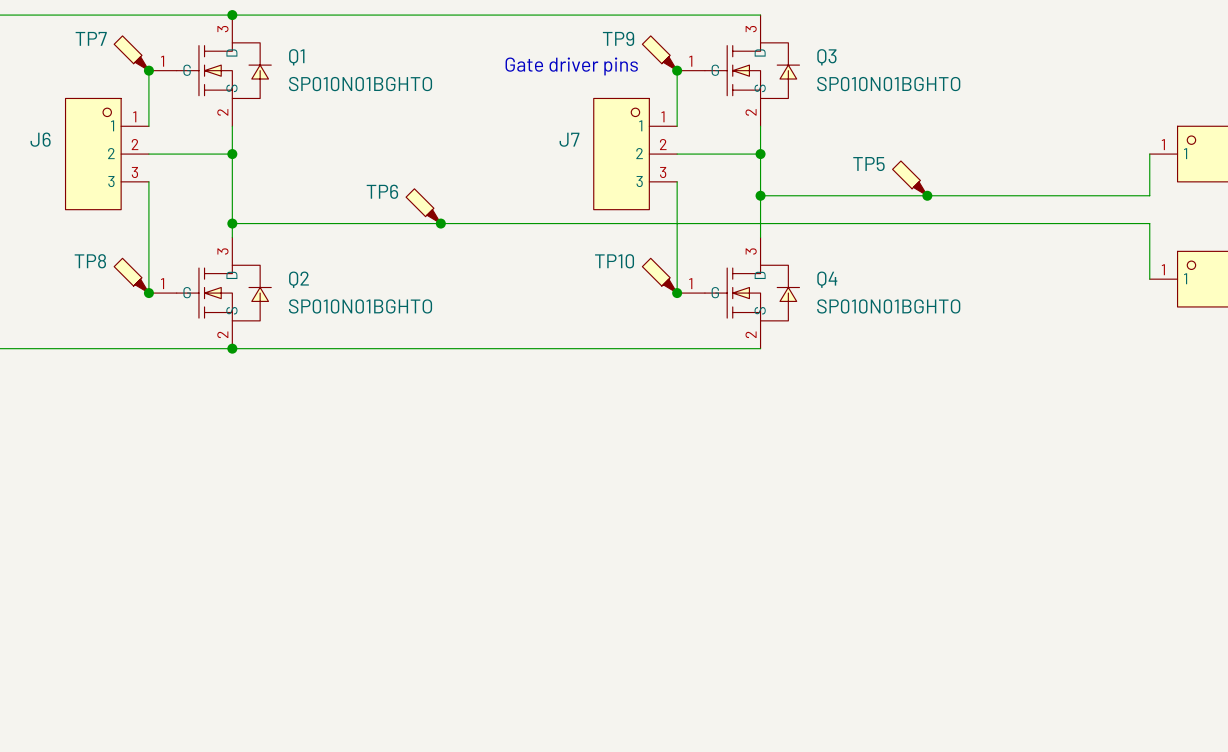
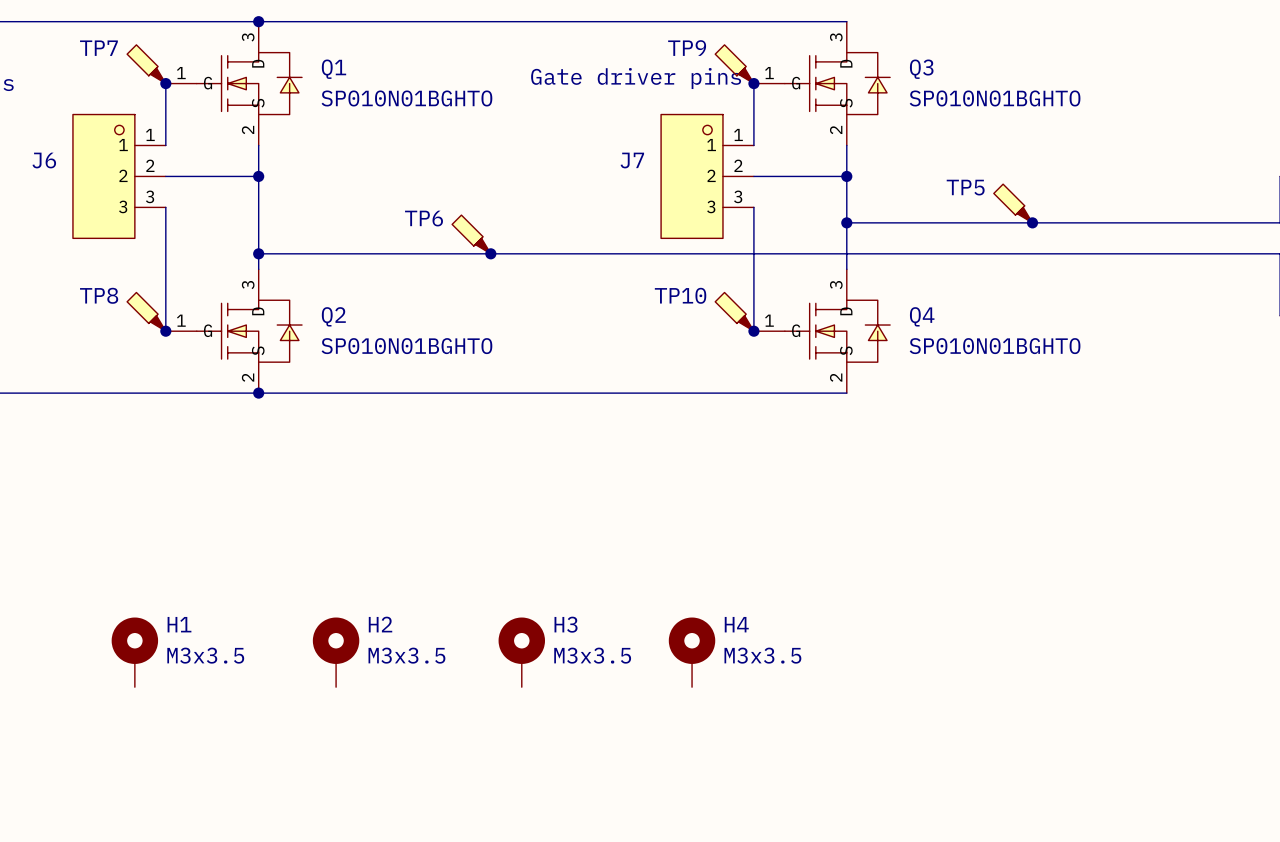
H1: none -> M3x3.5 (134, 652)
H2: none -> M3x3.5 (336, 652)
H3: none -> M3x3.5 (521, 652)
H4: none -> M3x3.5 (692, 652)

